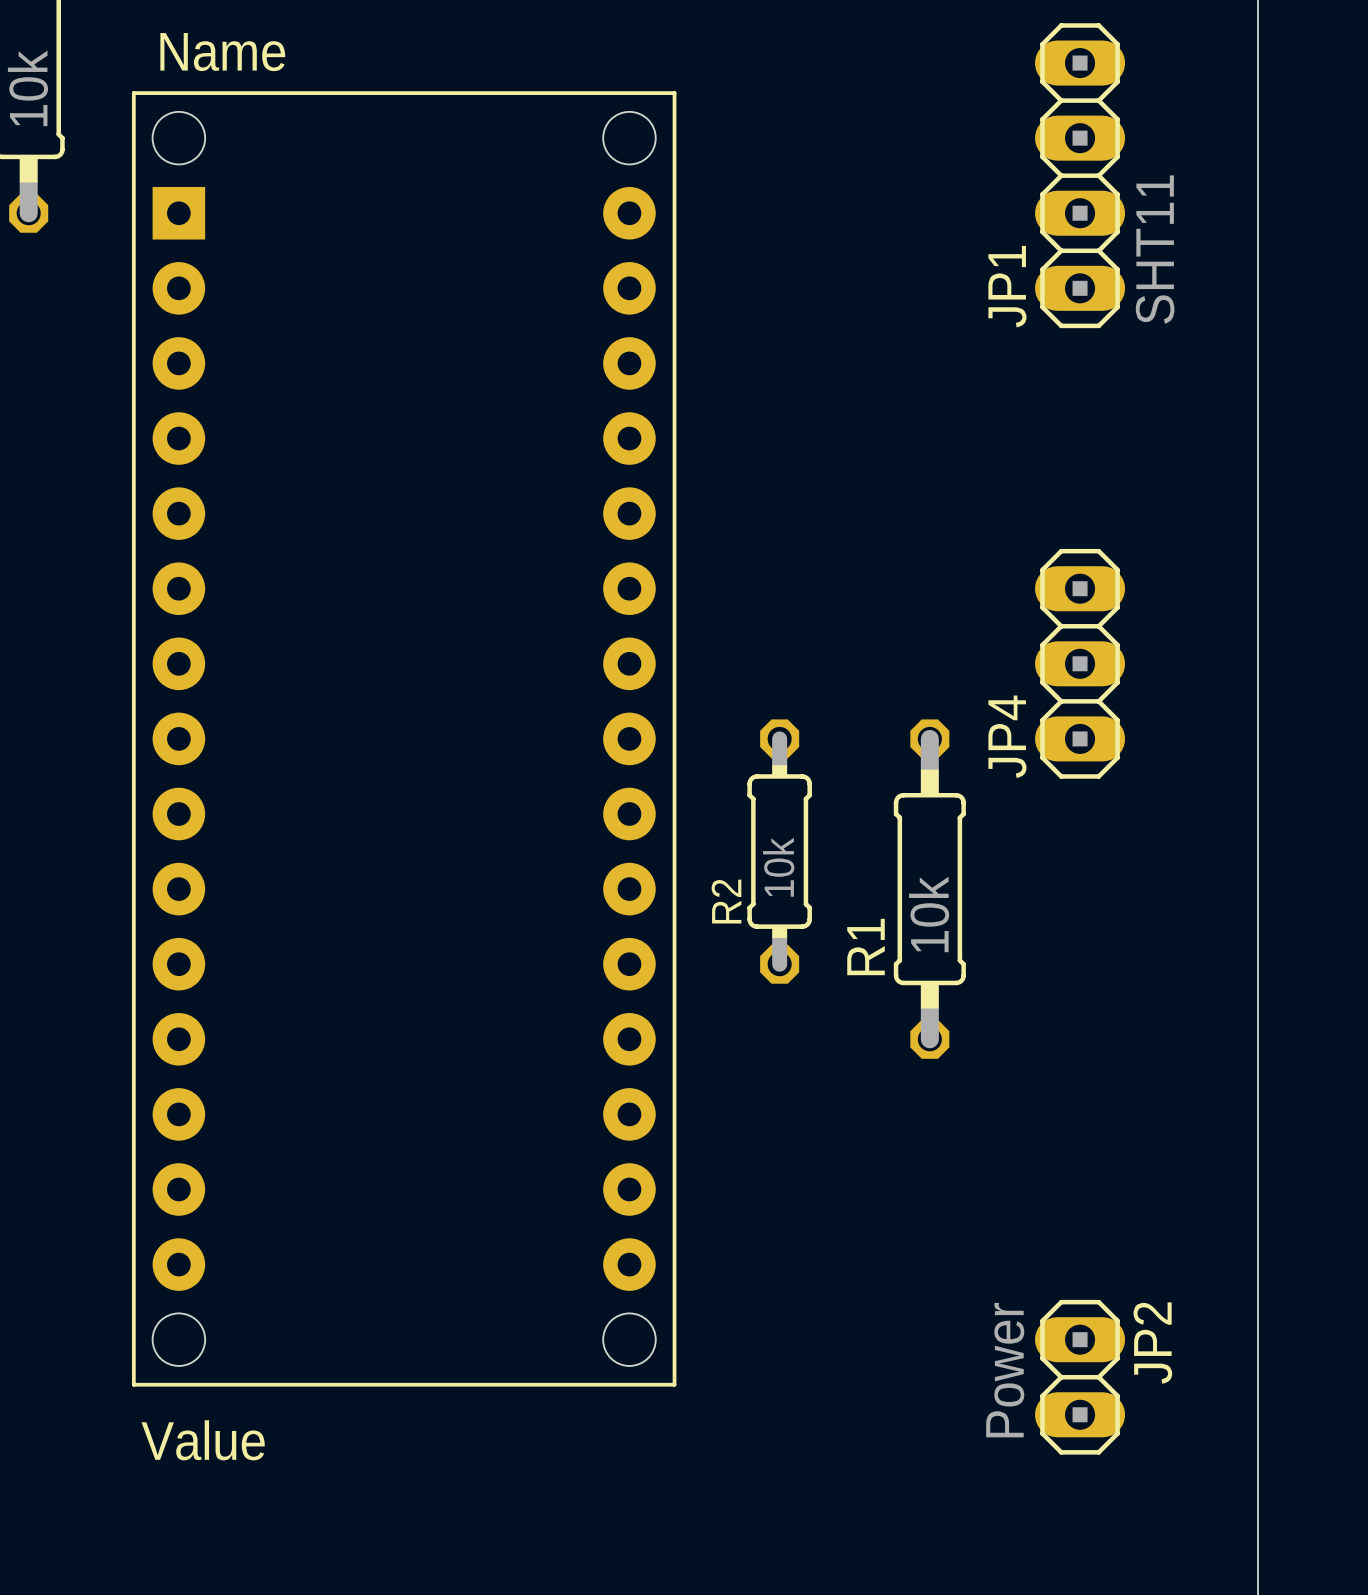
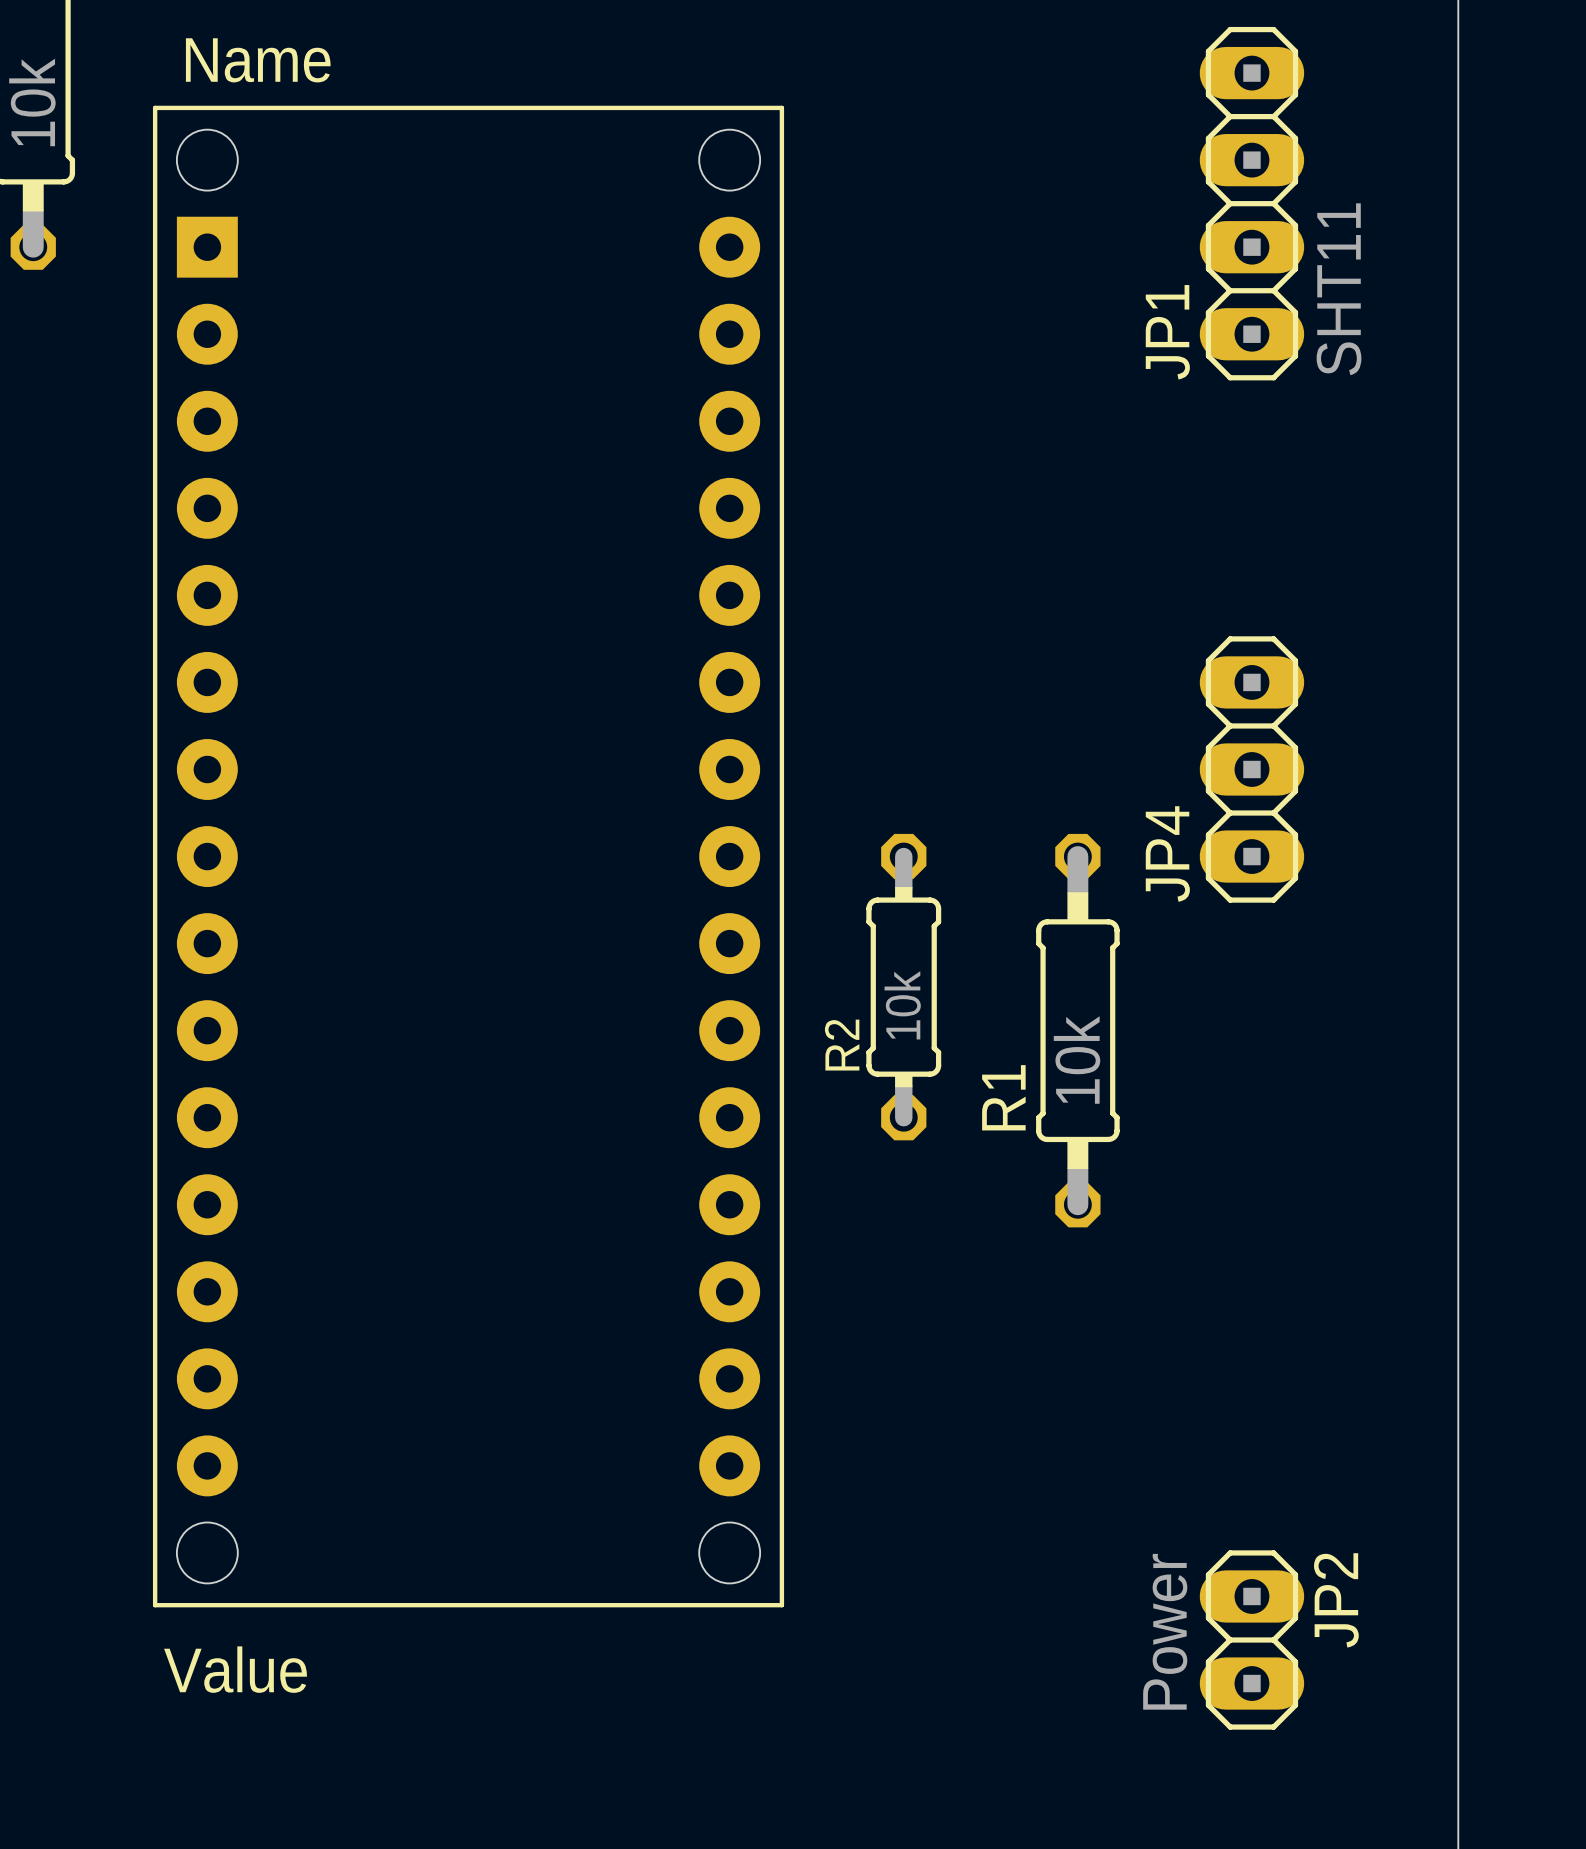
JP2 position: (1080, 1377) -> (1251, 1640)

